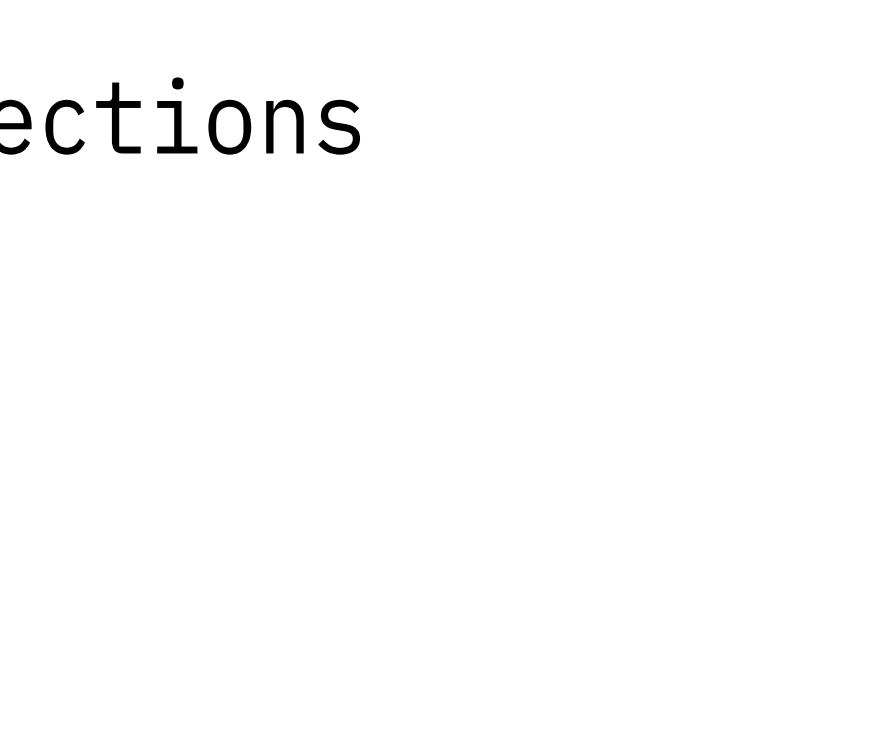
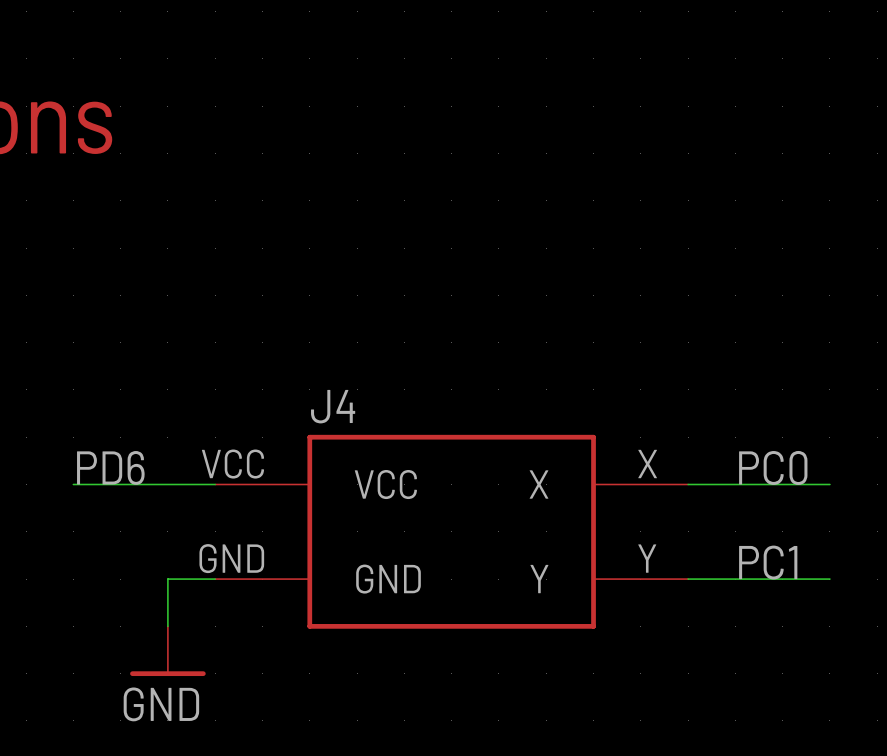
label: none -> PC0 (773, 467)
label: none -> PD6 (110, 467)
wire: none -> (73, 484) (215, 484)
wire: none -> (688, 484) (829, 484)
J4: none -> (451, 531)
label: none -> PC1 (768, 562)
wire: none -> (215, 579) (167, 579) (167, 626)
wire: none -> (688, 579) (829, 579)
power symbol: none -> GND (167, 651)

